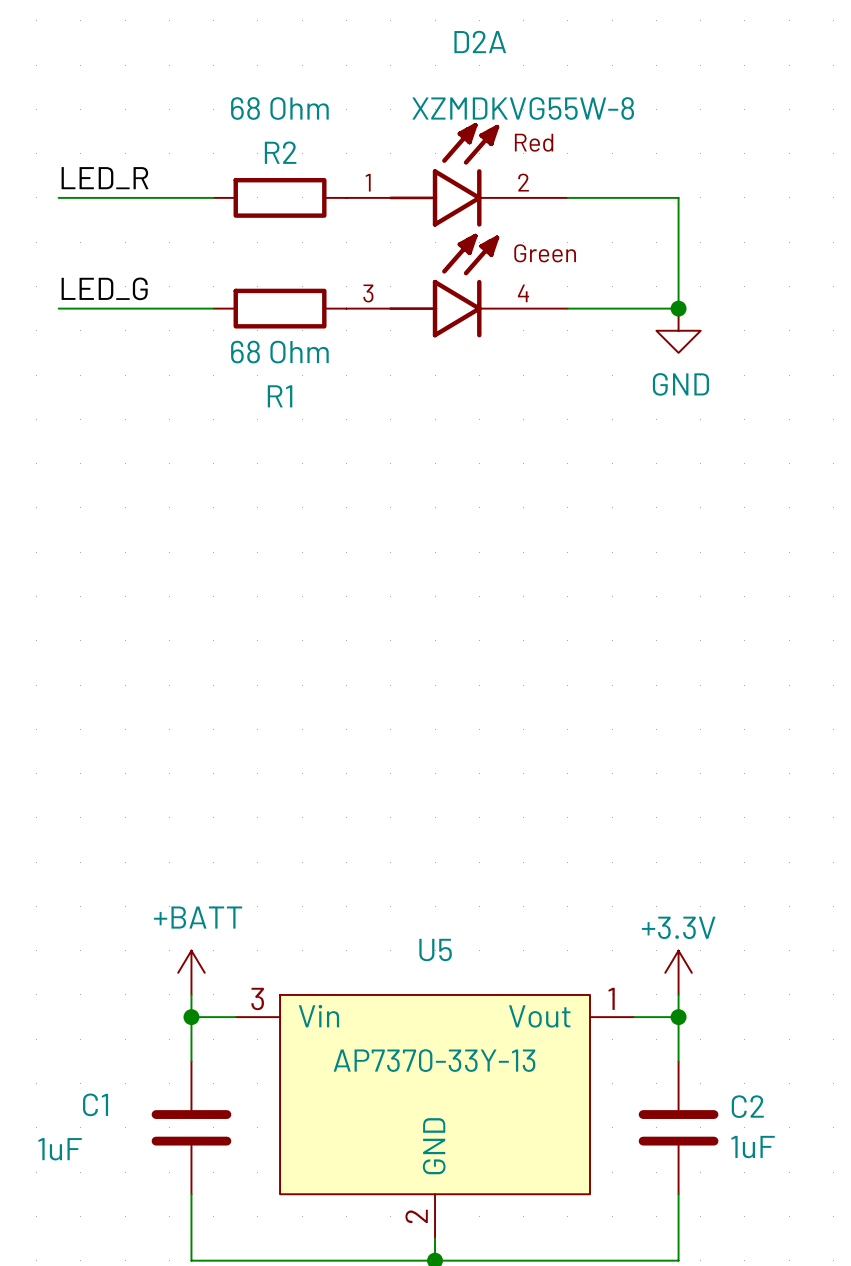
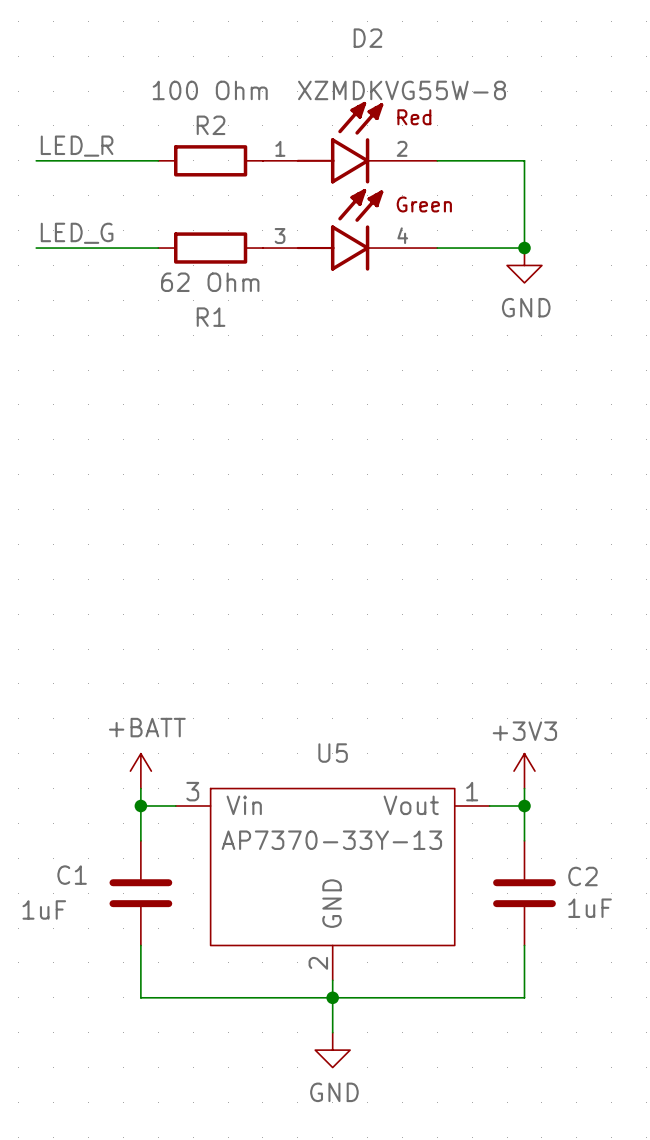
D2A name: D2A (480, 41) -> D2 (367, 38)
R2 value: 68 Ohm (279, 108) -> 100 Ohm (210, 90)
R1 value: 68 Ohm (279, 352) -> 62 Ohm (210, 282)
power symbol: +3.3V (678, 972) -> +3V3 (524, 771)

